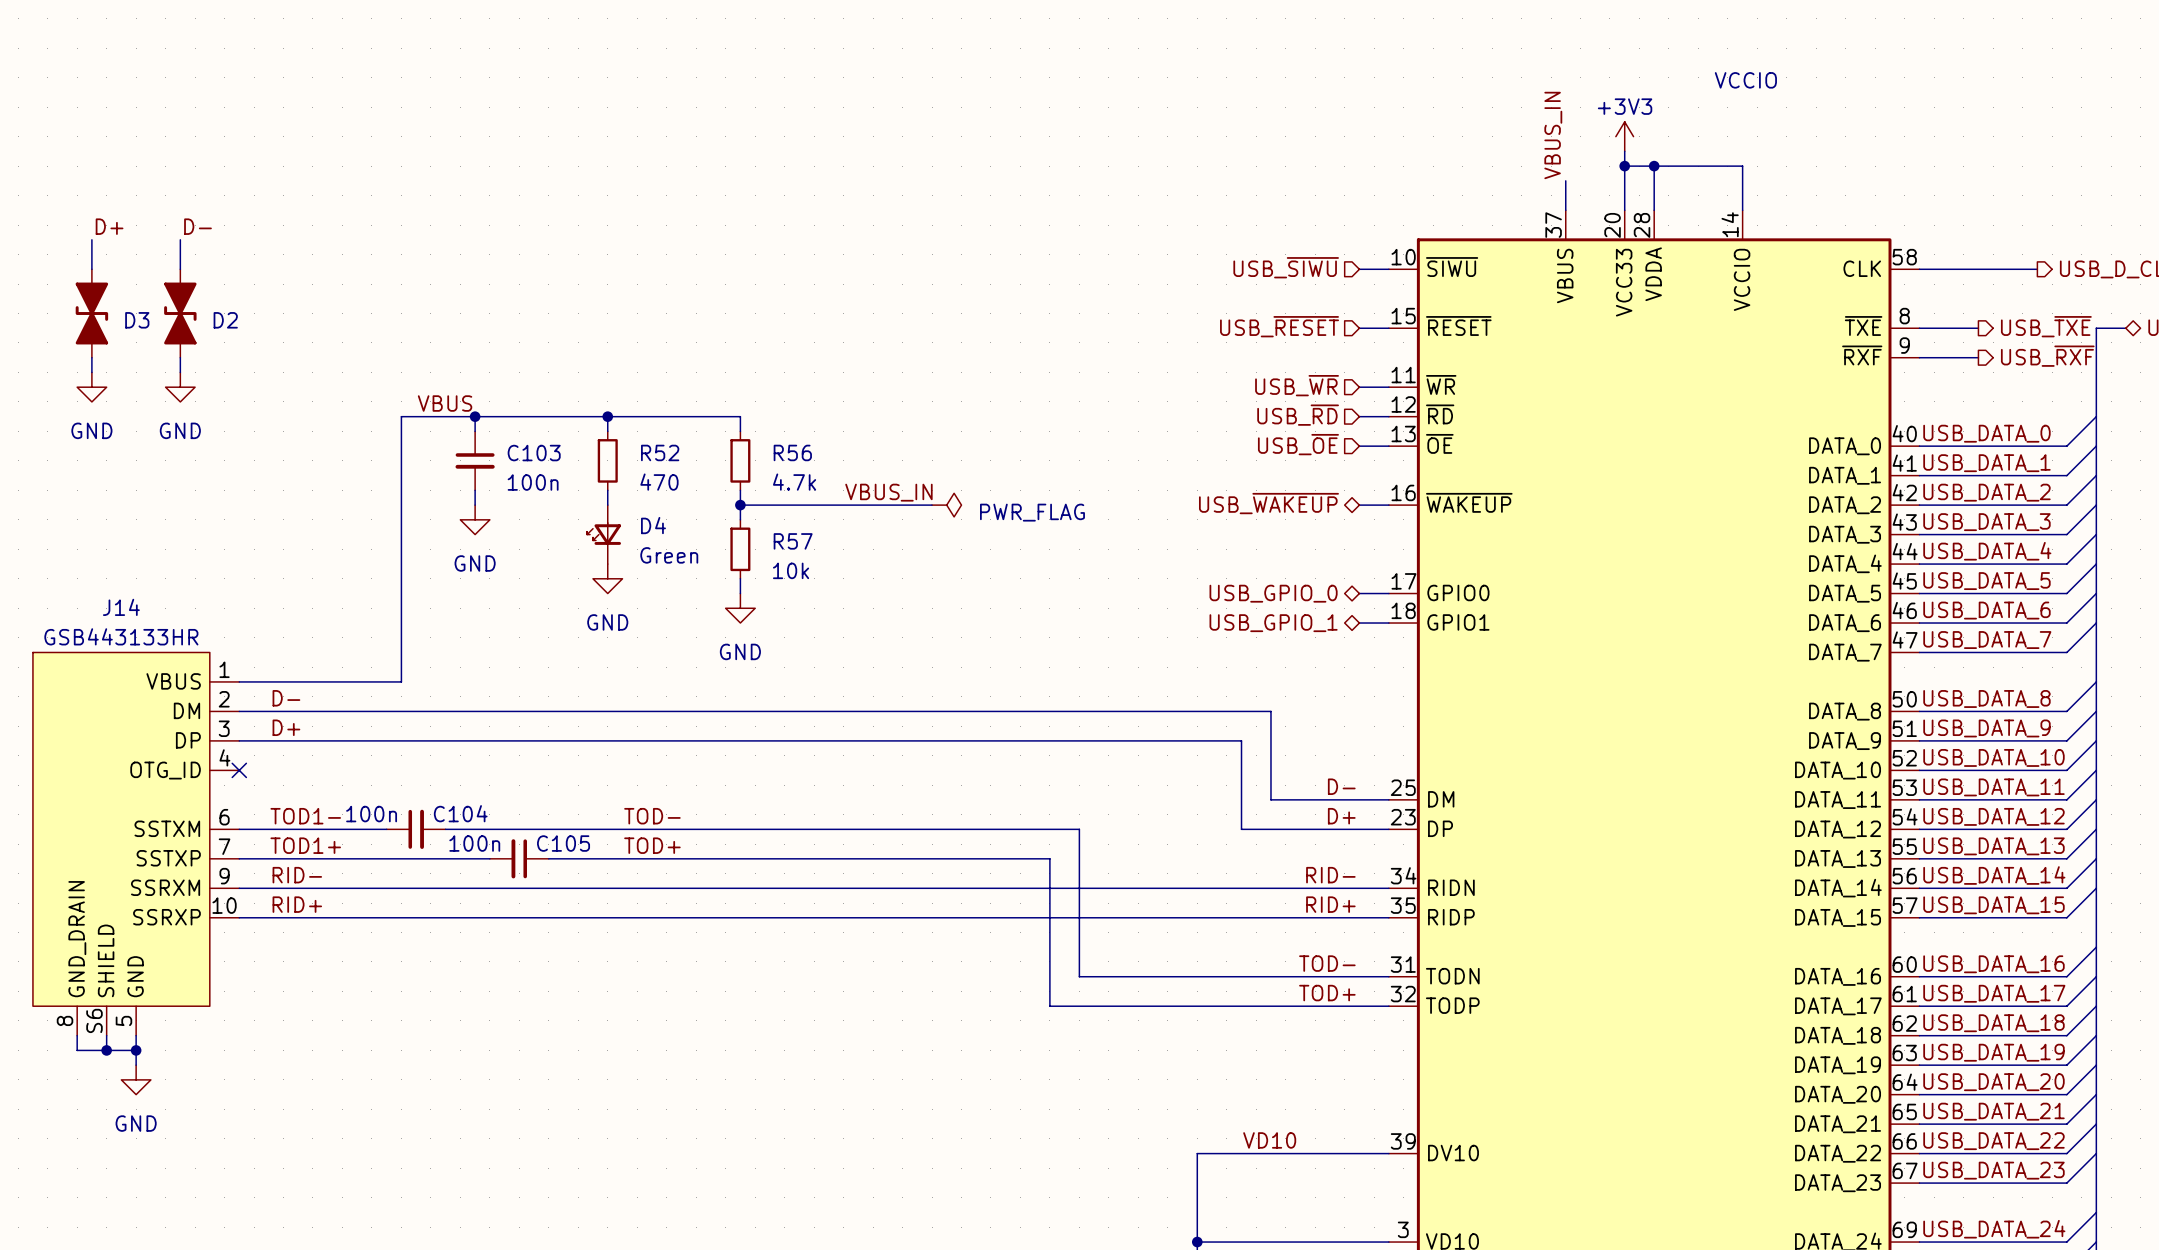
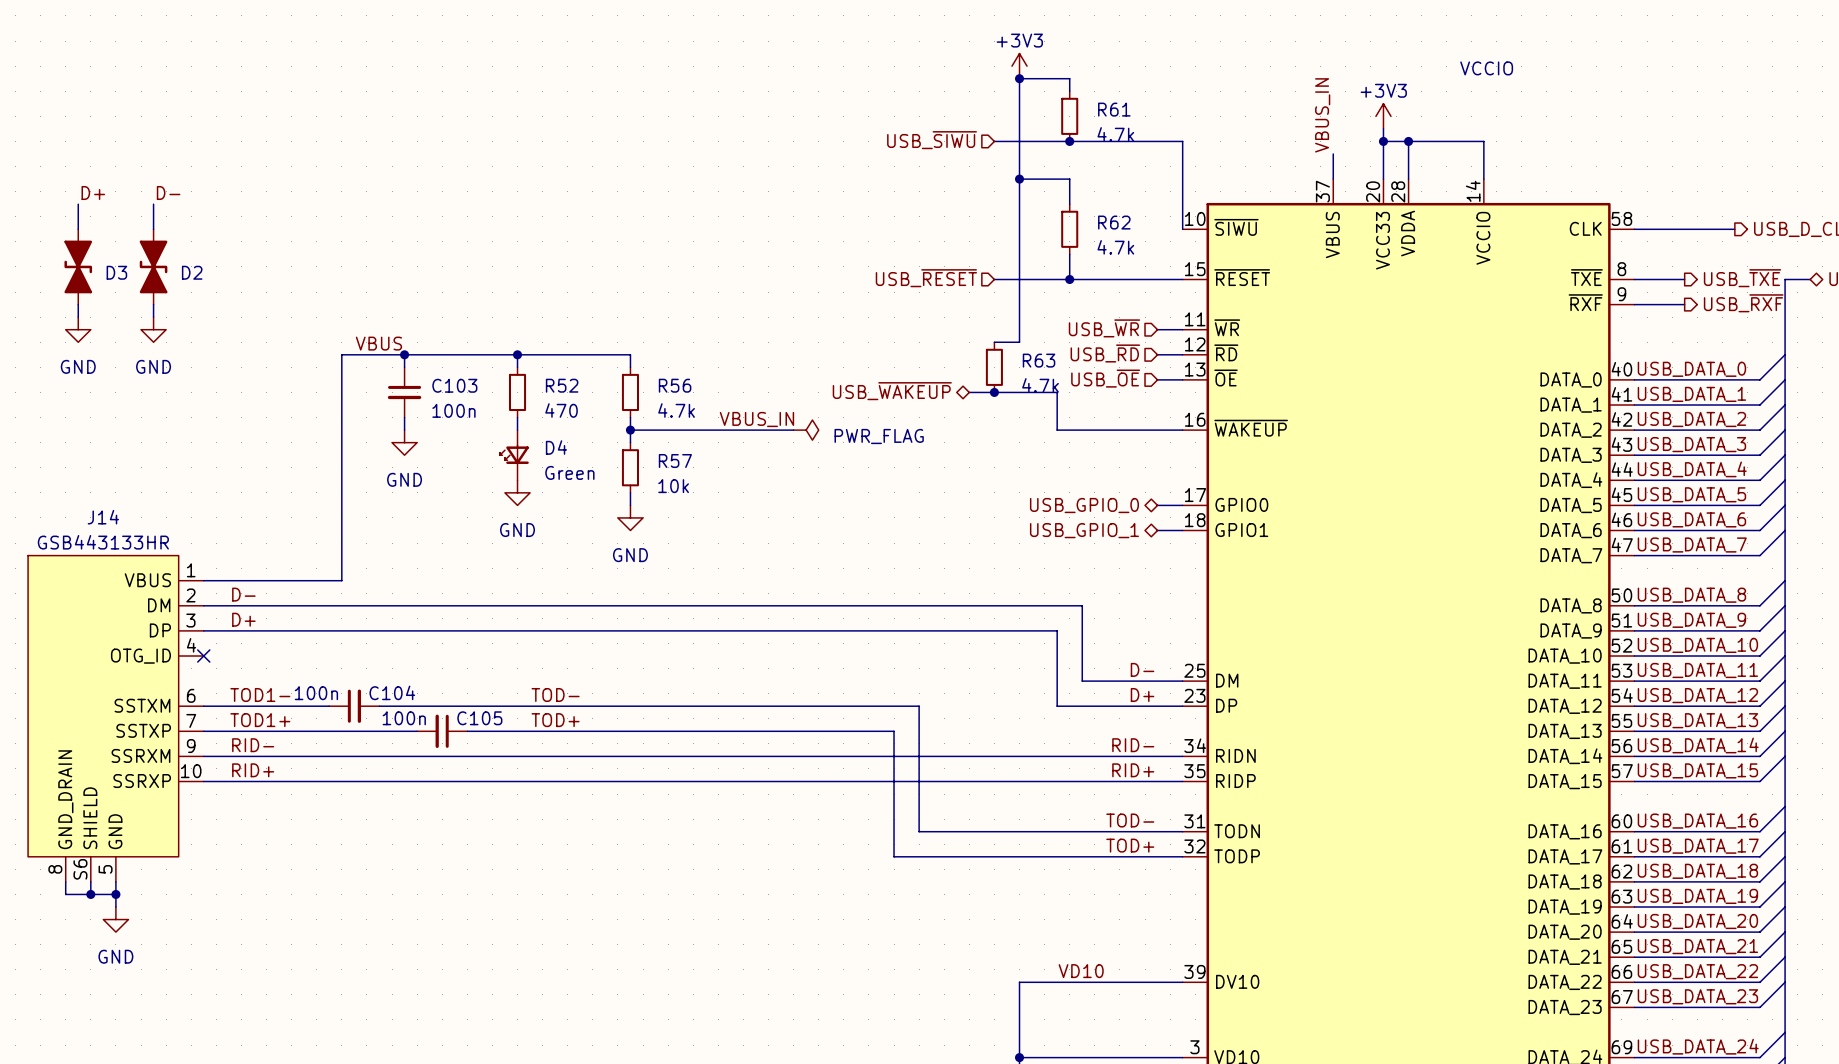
power symbol: none -> +3V3 (1019, 66)
junction: none -> (1019, 78)
wire: none -> (1069, 91) (1069, 78) (1019, 78) (1019, 342) (994, 342)
R61: none -> 4.7k (1069, 116)
junction: none -> (1069, 141)
wire: none -> (1019, 179) (1069, 179) (1069, 204)
junction: none -> (1019, 179)
hierarchical label position: USB_~{SIWU} (1286, 267) -> USB_~{SIWU} (932, 140)
R62: none -> 4.7k (1069, 229)
wire: (1359, 269) (1388, 269) -> (994, 141) (1182, 141) (1182, 229)
wire: none -> (1069, 254) (1069, 279)
hierarchical label position: USB_~{RESET} (1279, 326) -> USB_~{RESET} (926, 278)
wire: none -> (994, 279) (1157, 279)
junction: none -> (1069, 279)
R63: none -> 4.7k (994, 367)
wire: none -> (969, 392) (1057, 392) (1057, 430) (1157, 430)
junction: none -> (994, 392)
hierarchical label position: USB_~{WAKEUP} (1268, 503) -> USB_~{WAKEUP} (892, 391)

